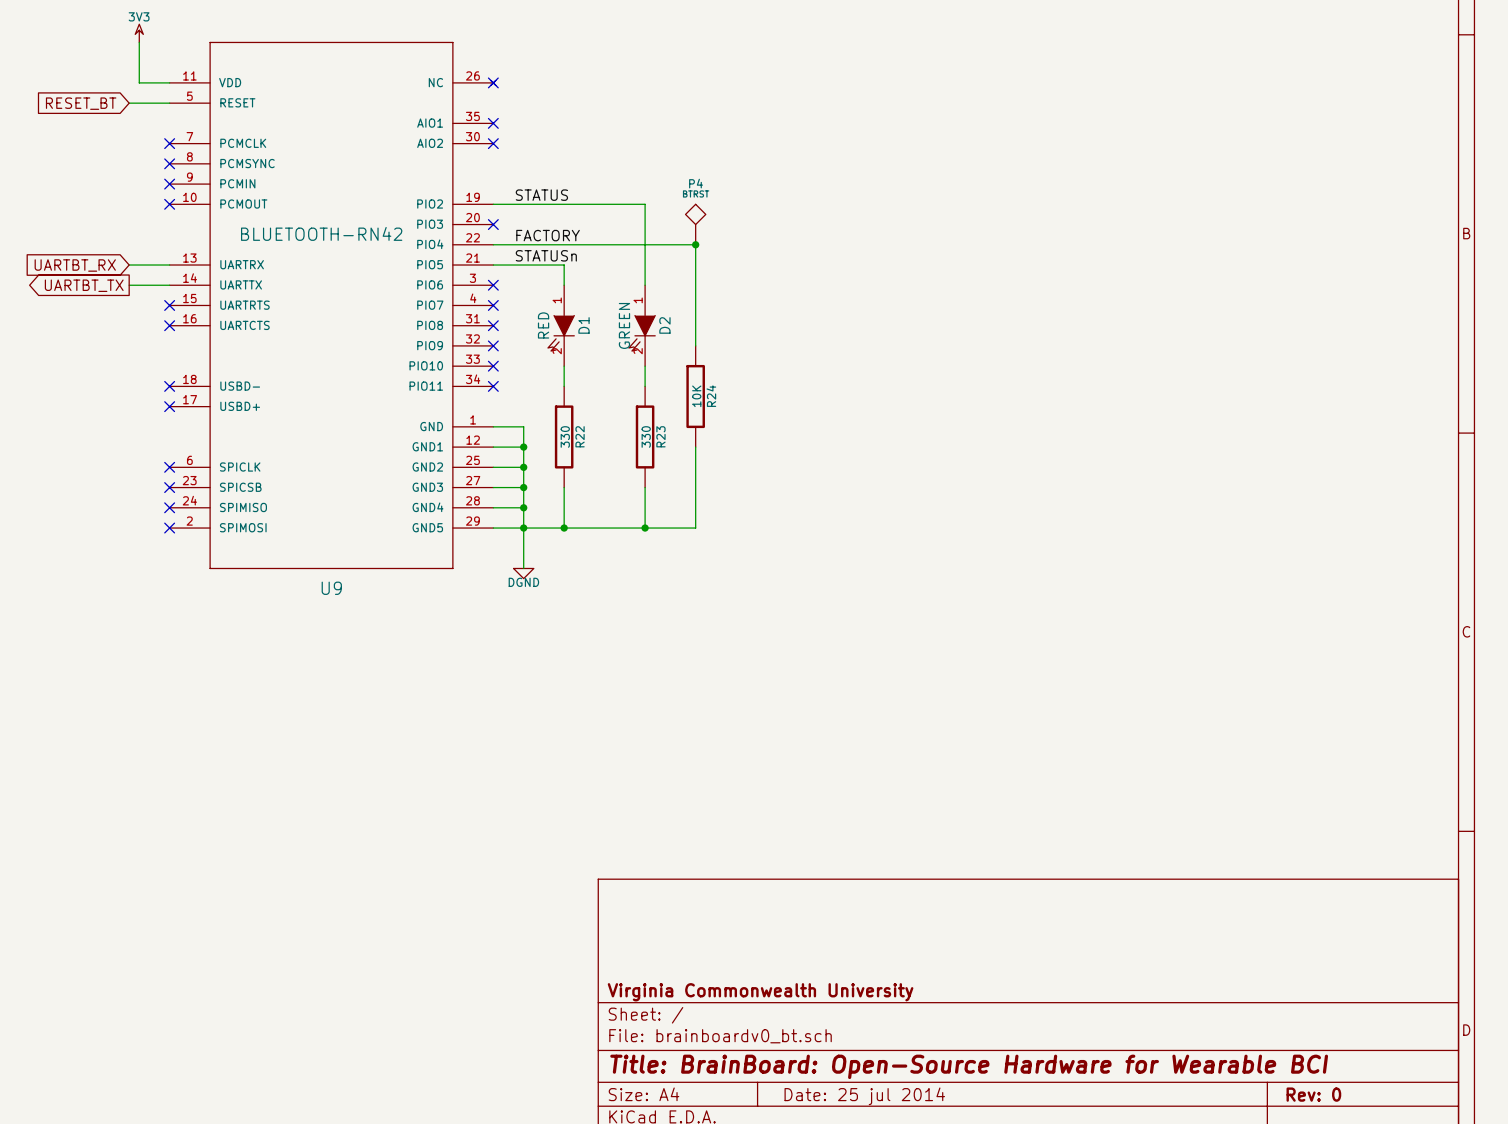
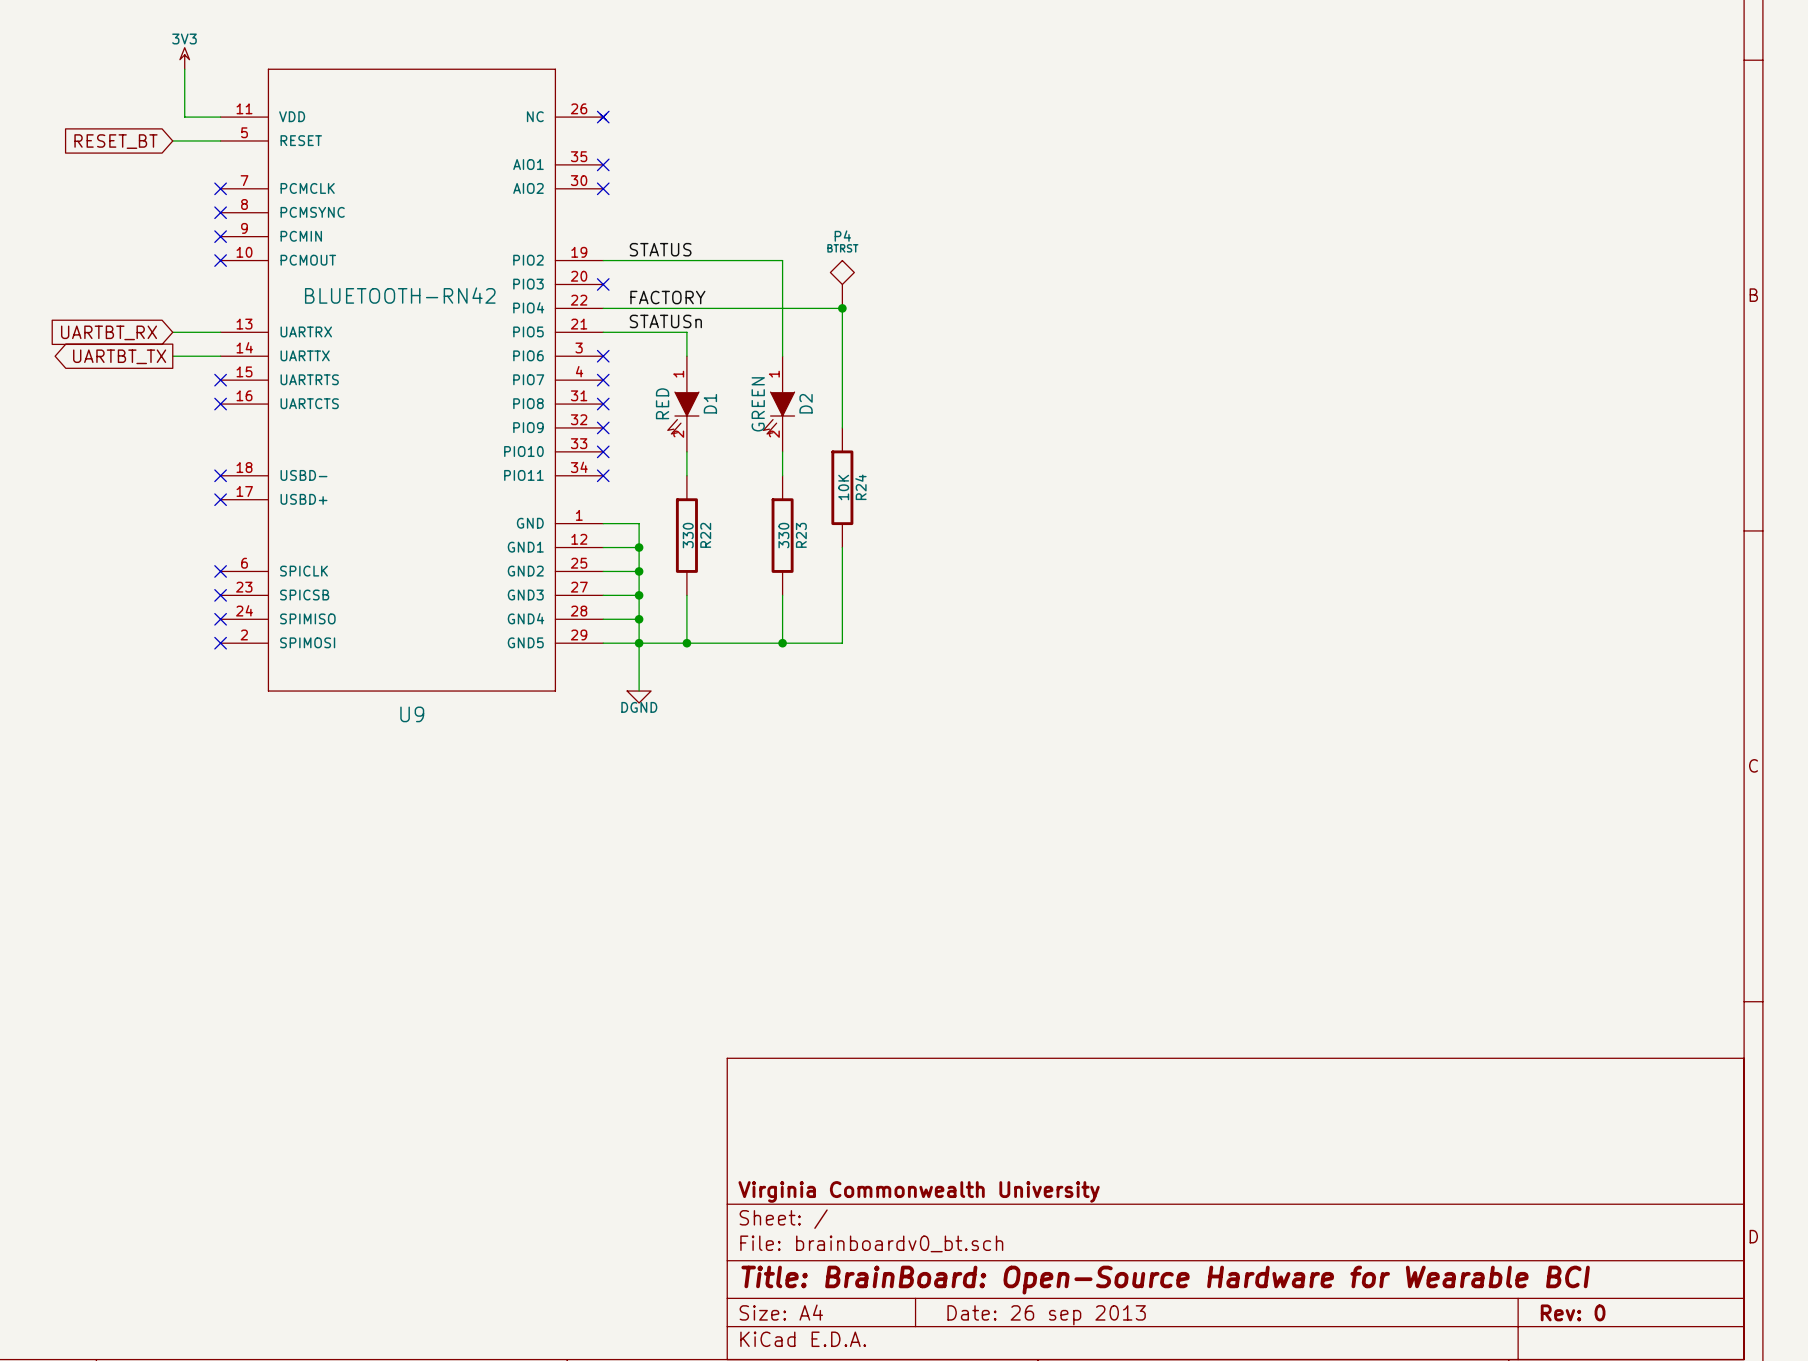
title block: Date: 25 jul 2014 (864, 1096) -> Date: 26 sep 2013 (1046, 1315)

